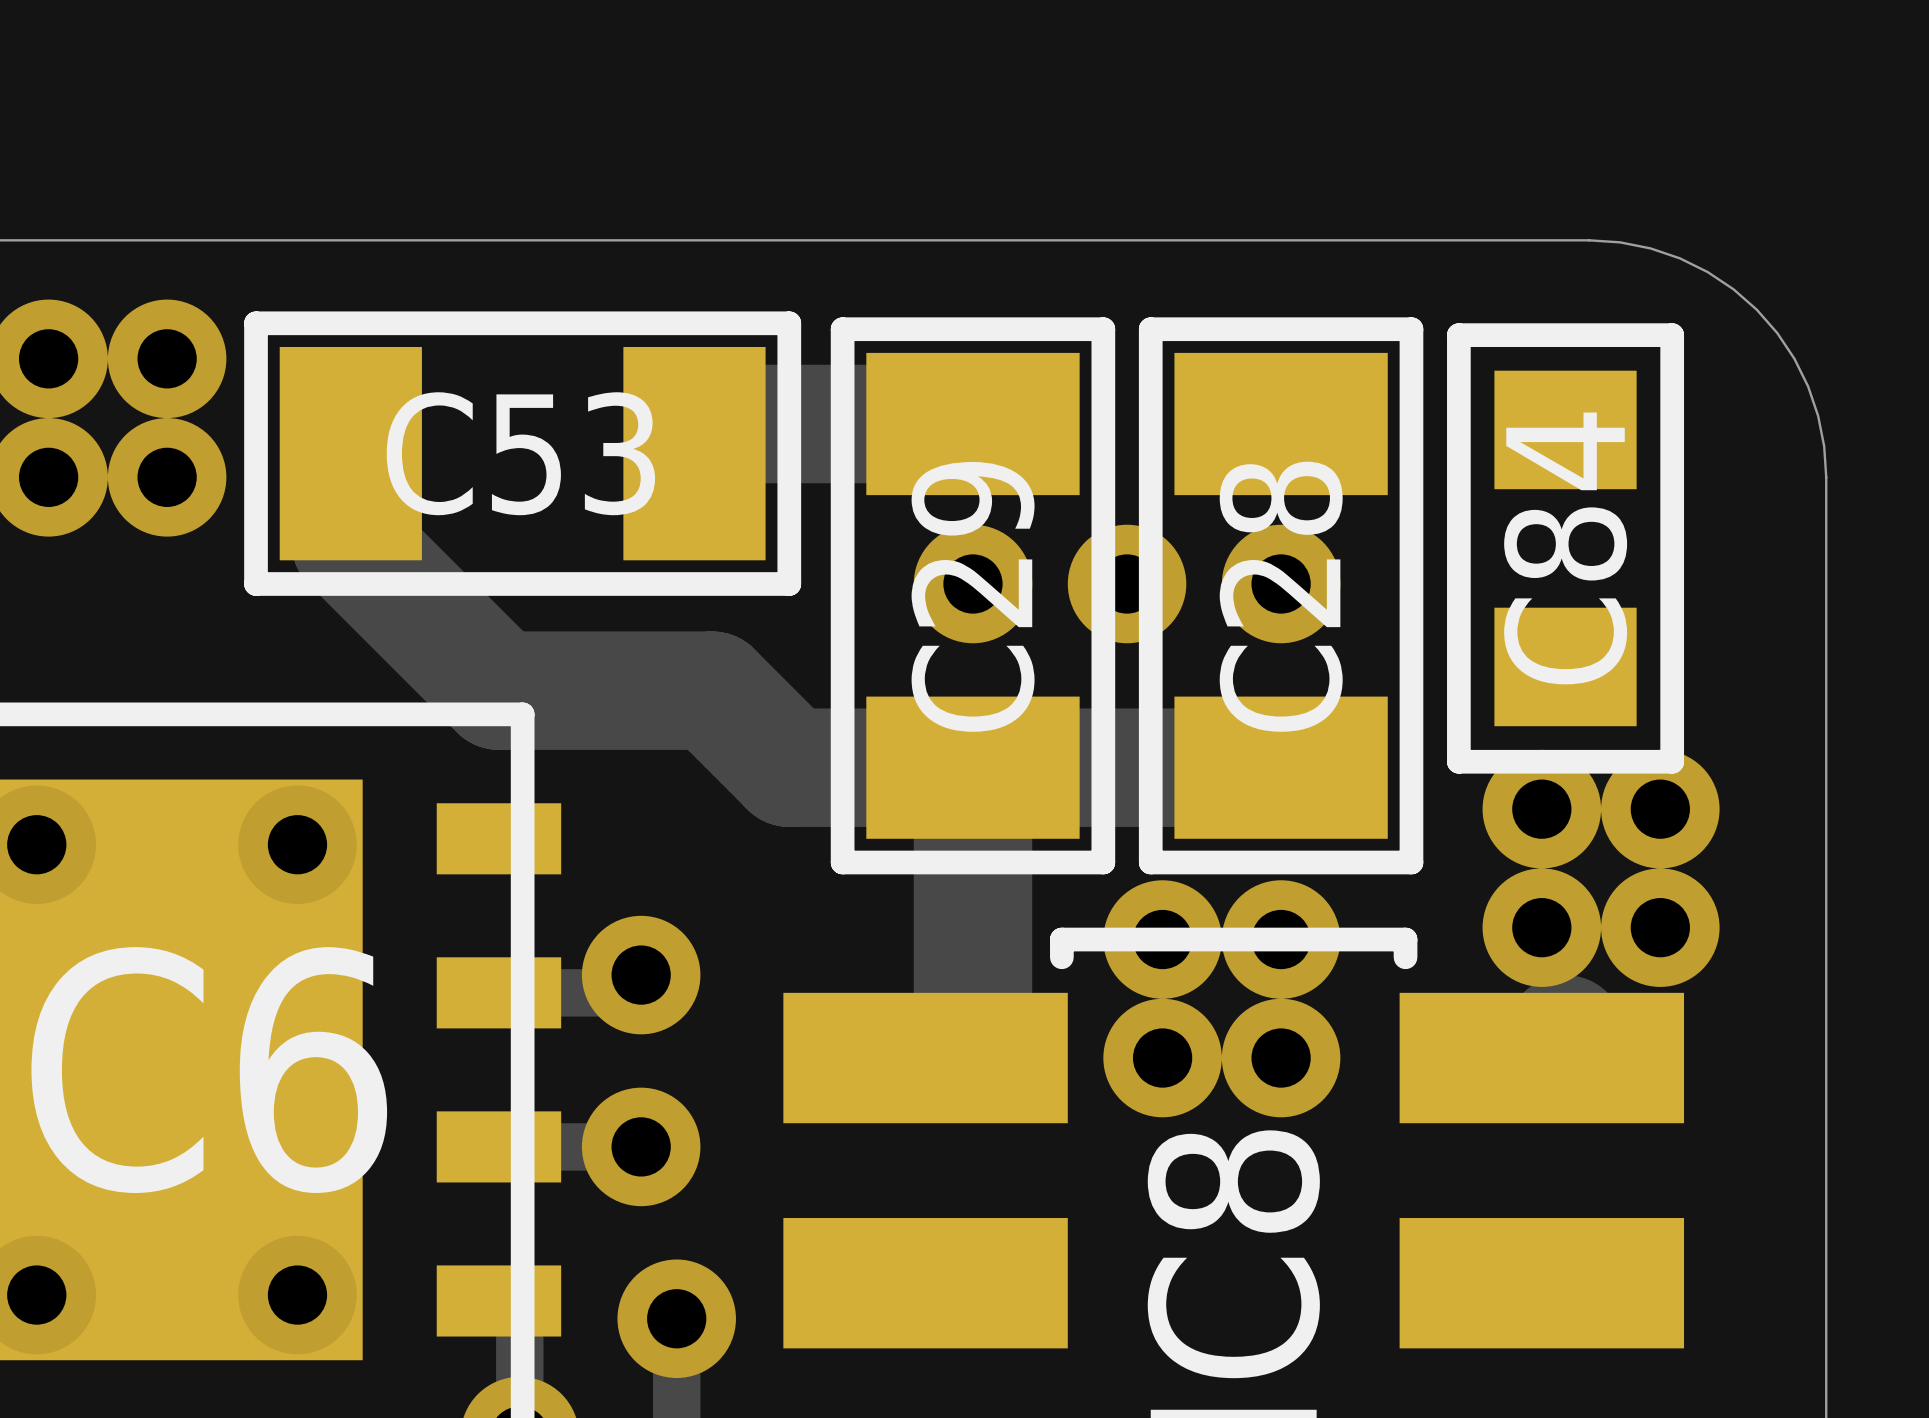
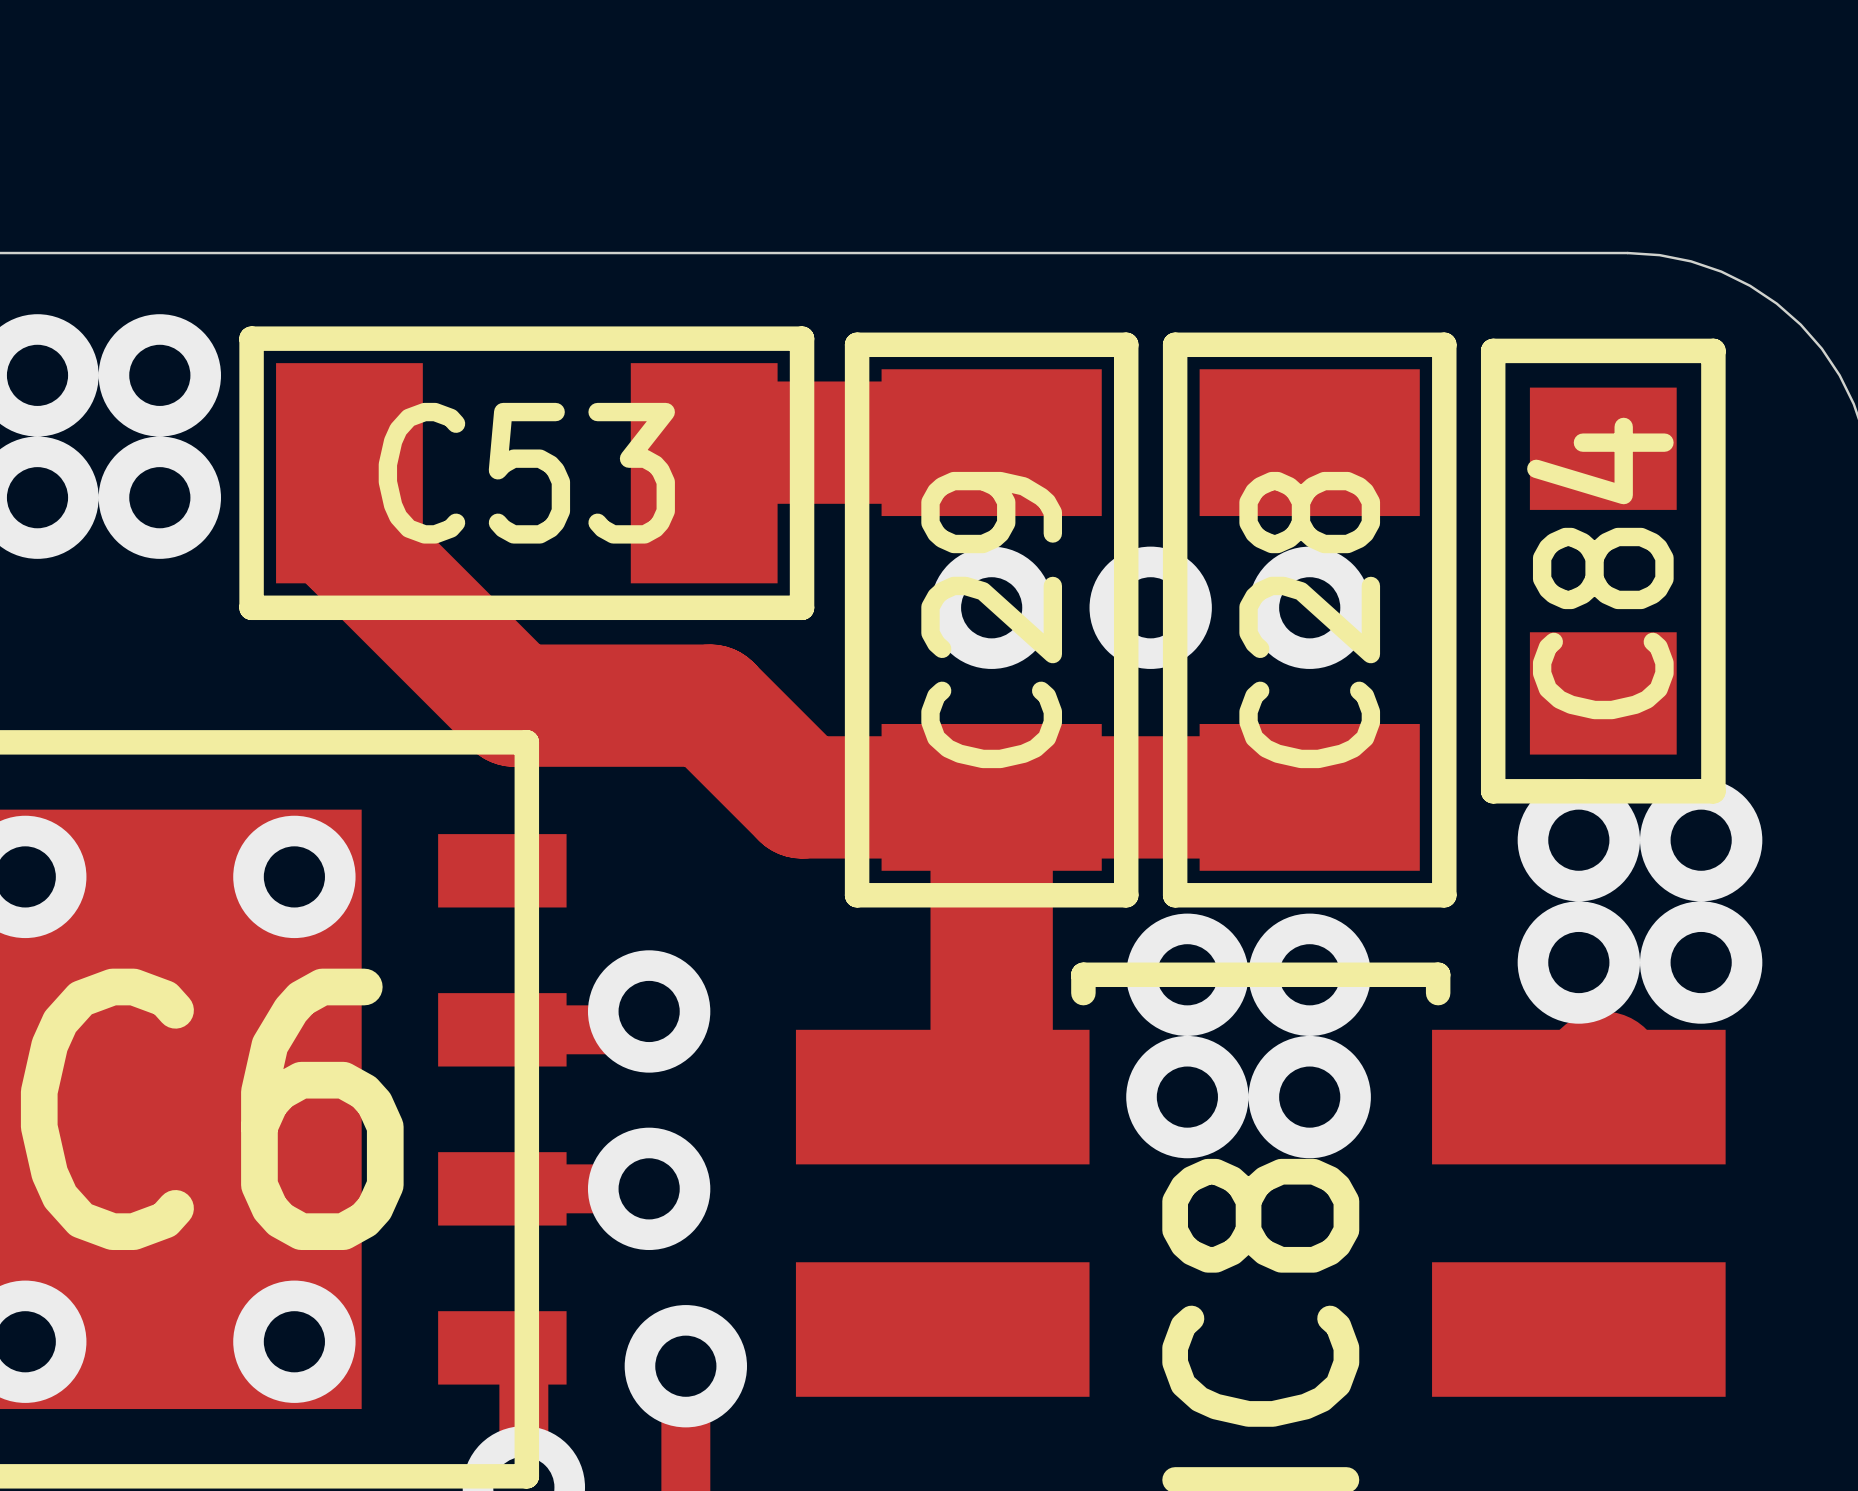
track: (350, 518) (350, 542) (498, 690) (712, 690) -> (349, 540) (514, 705) (710, 705) (722, 717)

